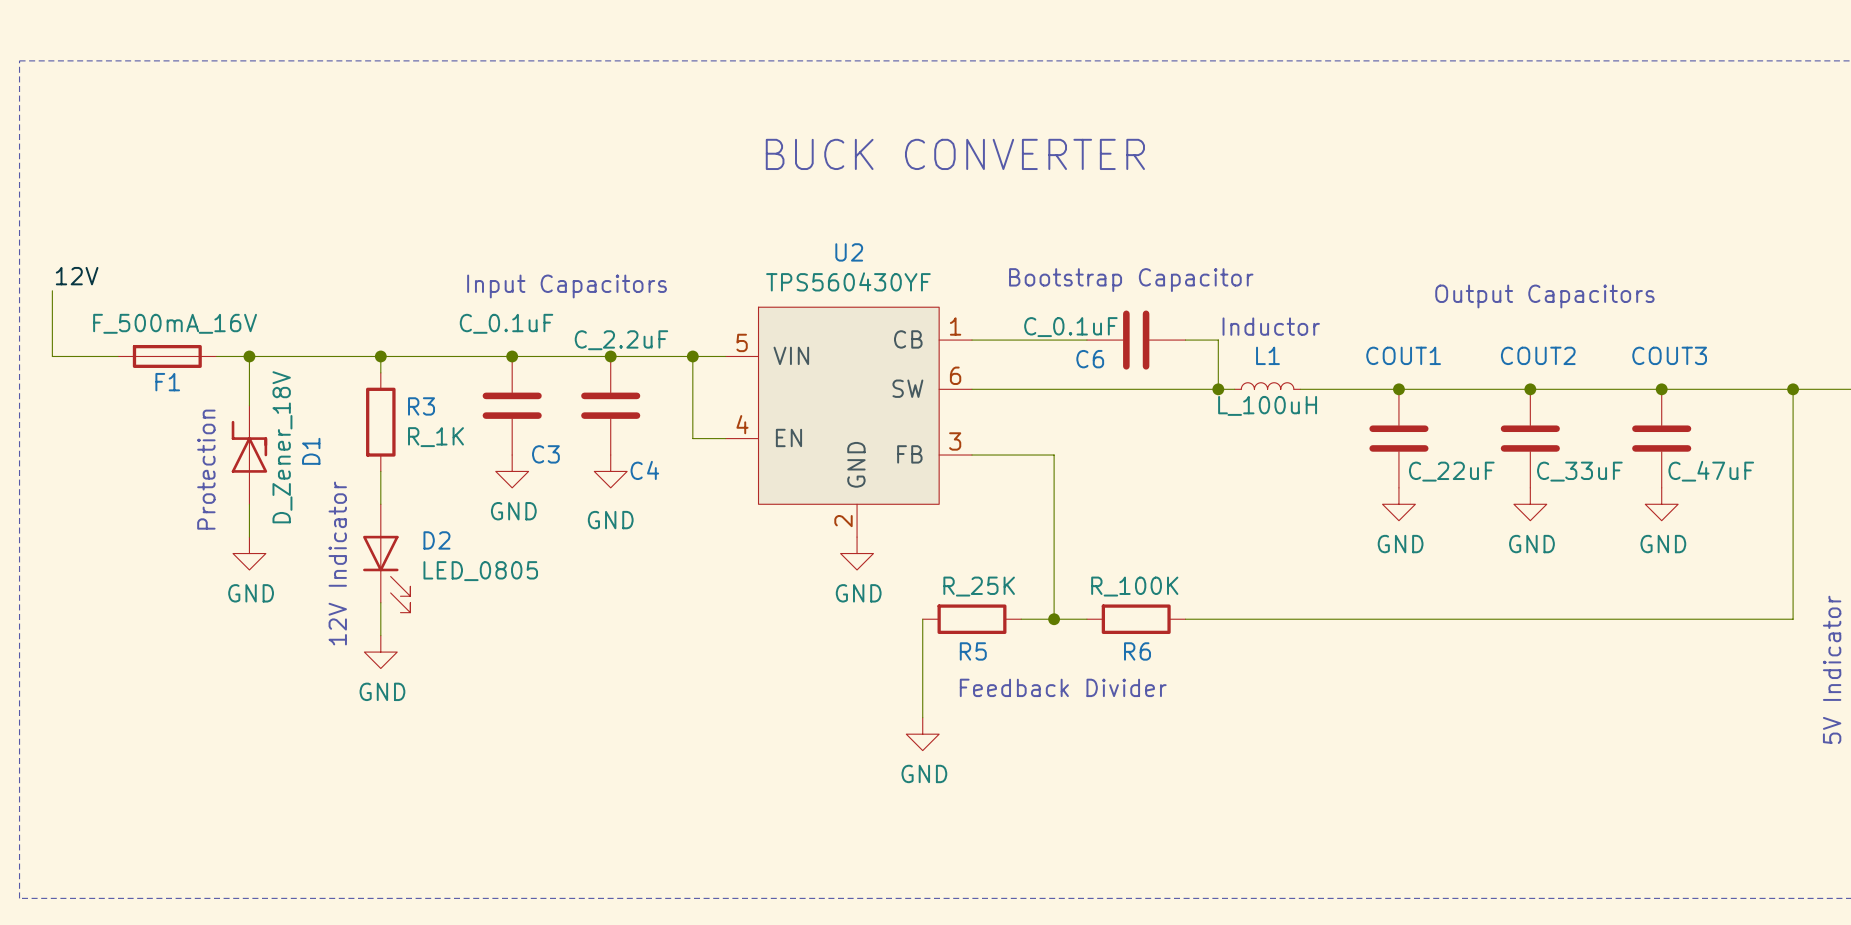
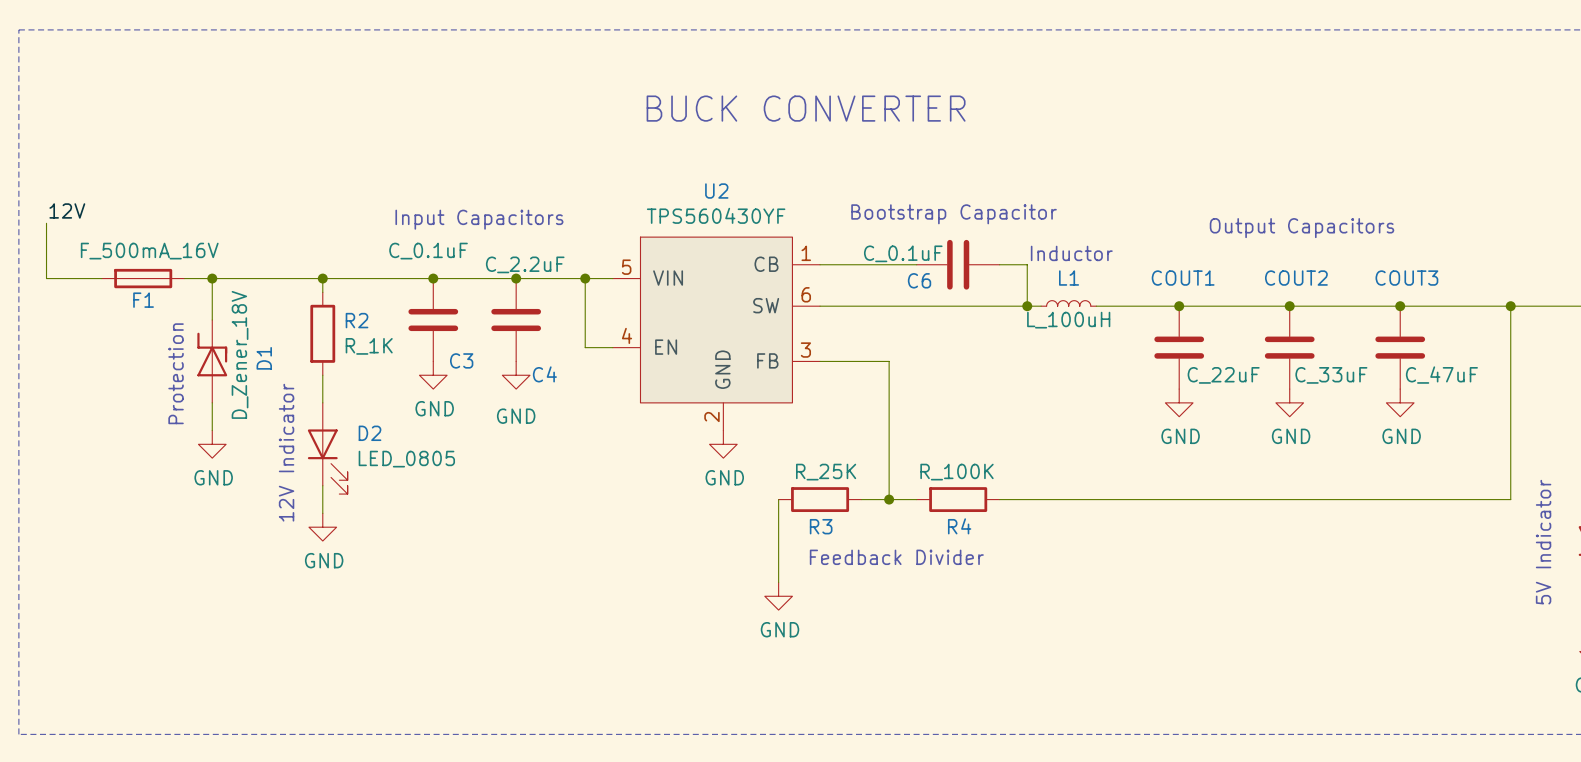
R3 name: R3 (421, 406) -> R2 (357, 320)
R5 name: R5 (973, 651) -> R3 (821, 526)
R6 name: R6 (1137, 651) -> R4 (959, 526)

